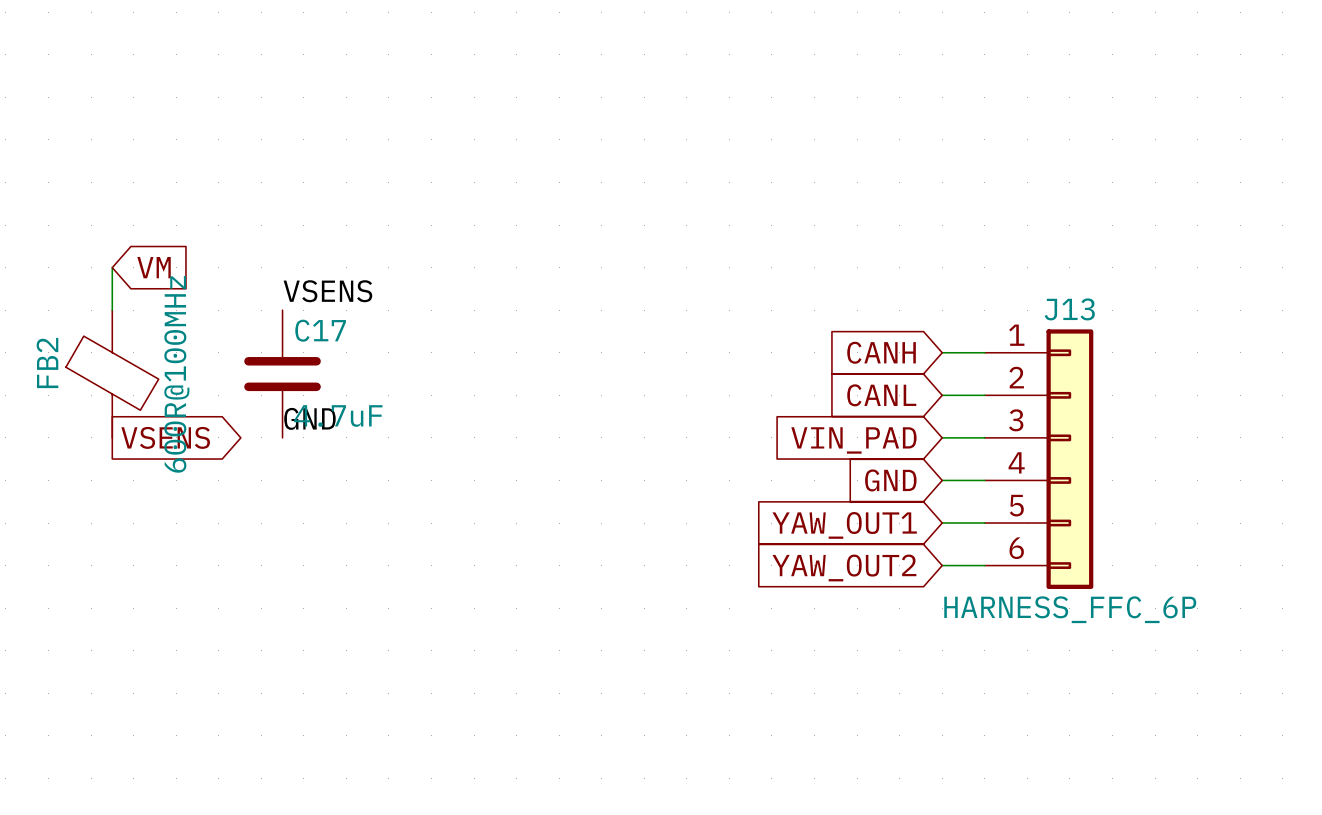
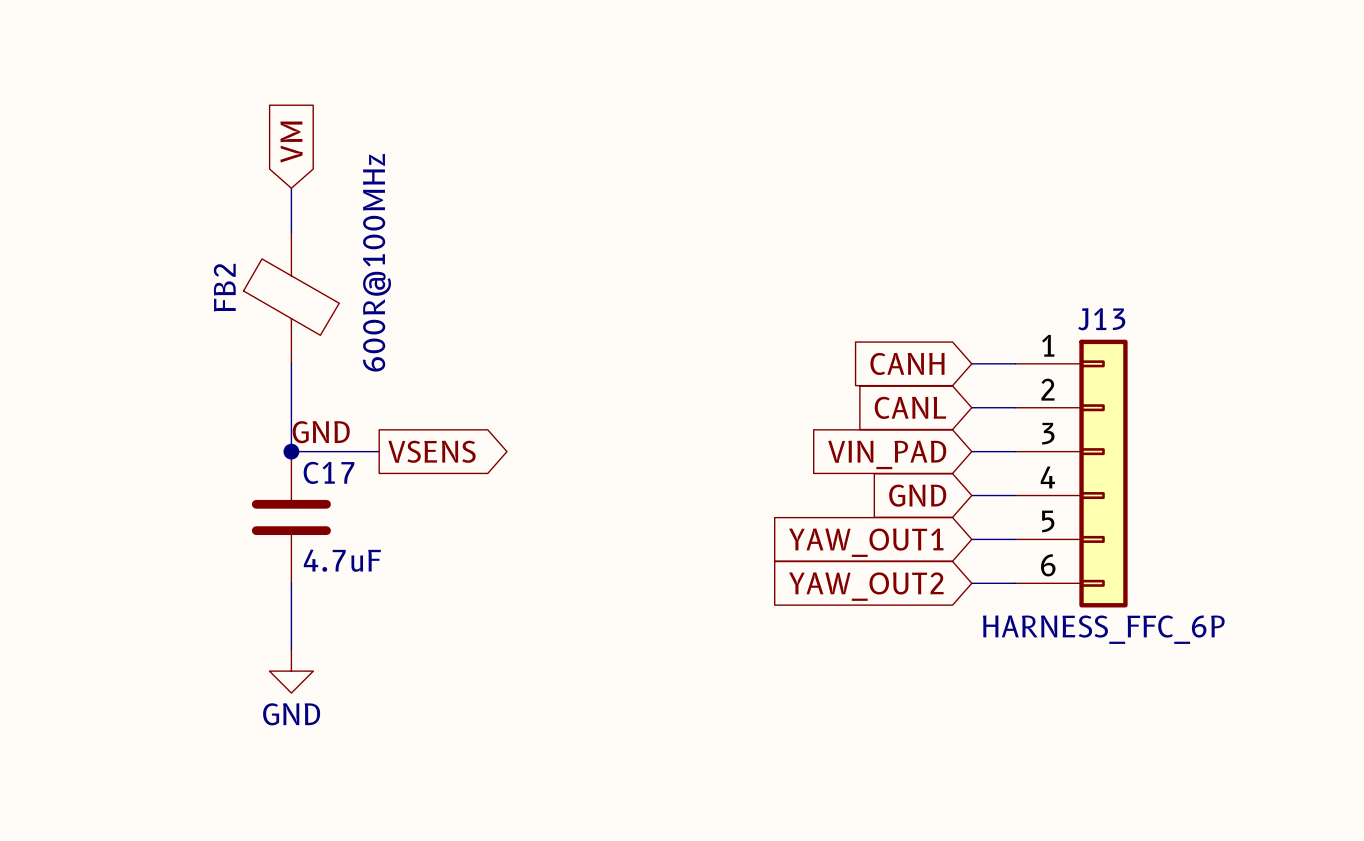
wire: (112, 267) (112, 310) -> (291, 188) (291, 232)
global label rotation: 0° (154, 267) -> 90° counterclockwise (291, 142)
global label position: VM (154, 267) -> VM (291, 142)
label: VSENS (327, 291) -> none
wire: none -> (291, 363) (291, 451) (379, 451)
FB2 position: (112, 374) -> (291, 297)
FB2 value position: 600R@100MHz (176, 374) -> 600R@100MHz (376, 262)
C17 position: (282, 374) -> (291, 517)
global label position: VSENS (165, 437) -> VSENS (432, 451)
junction: none -> (291, 451)
wire: none -> (291, 583) (291, 649)
power symbol: none -> GND (291, 671)

